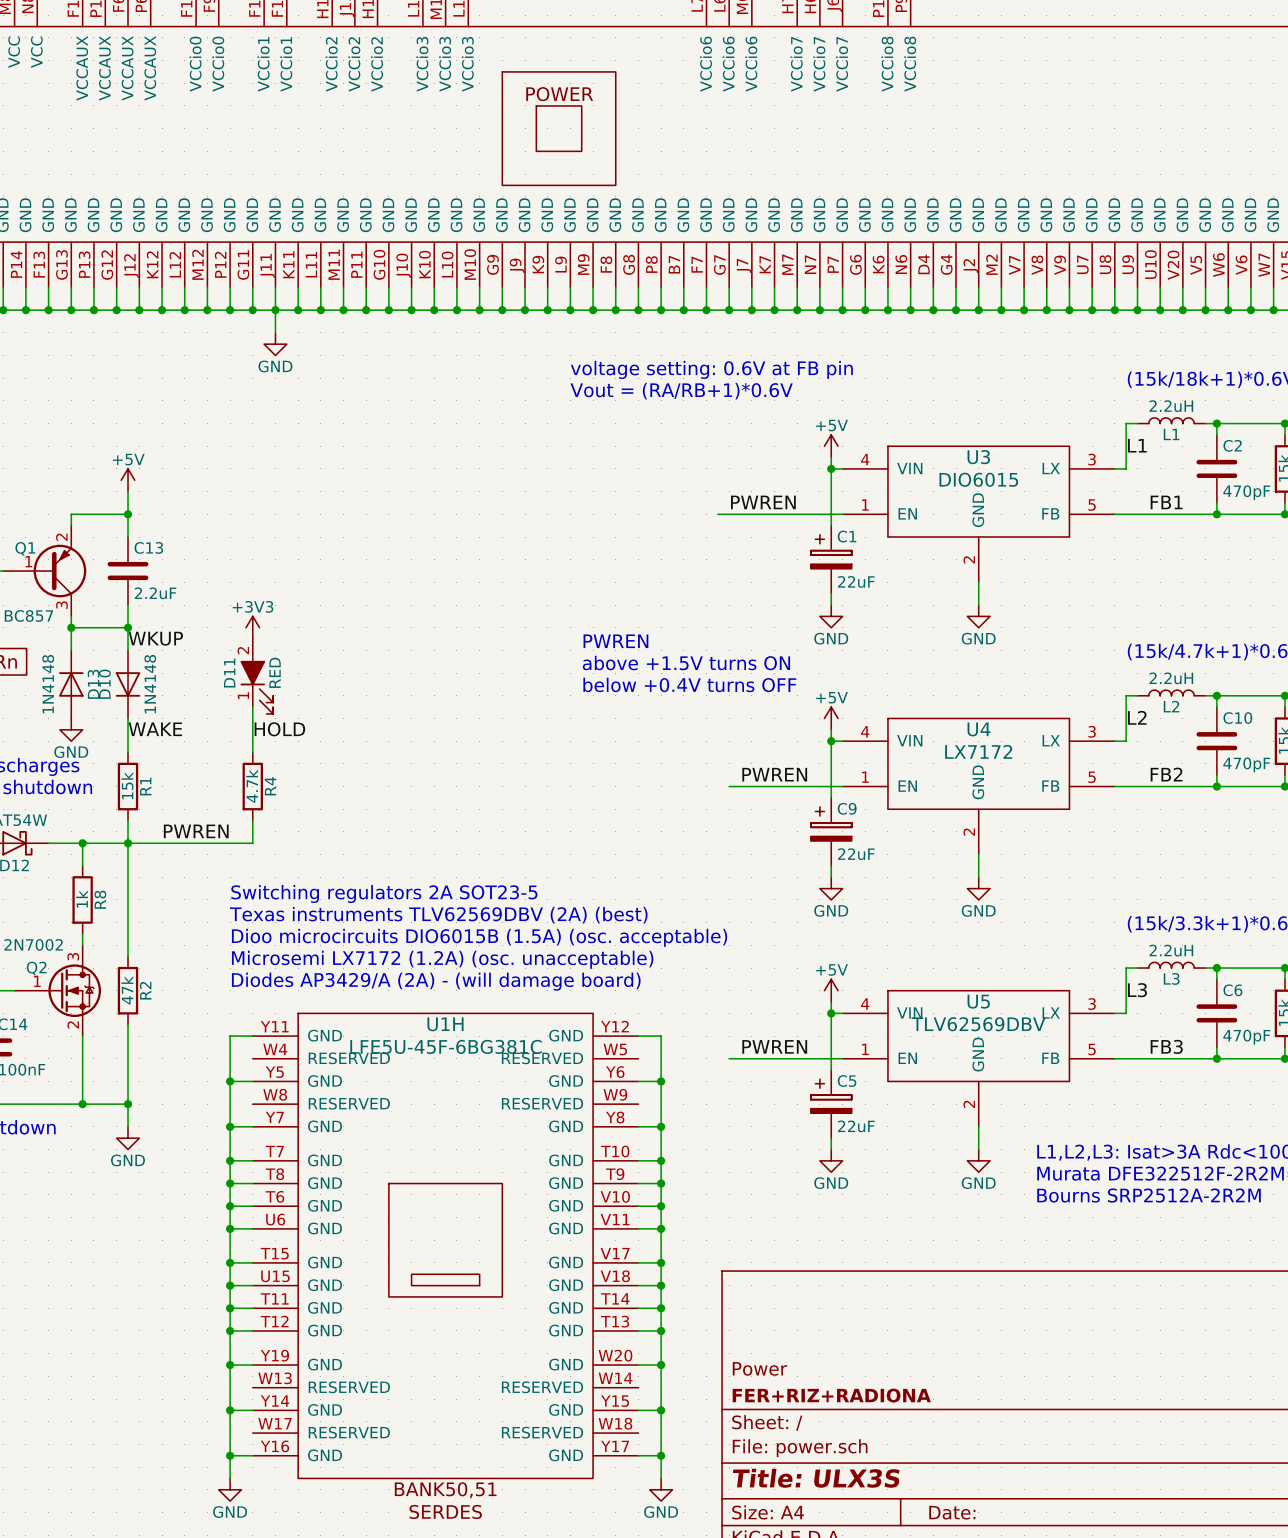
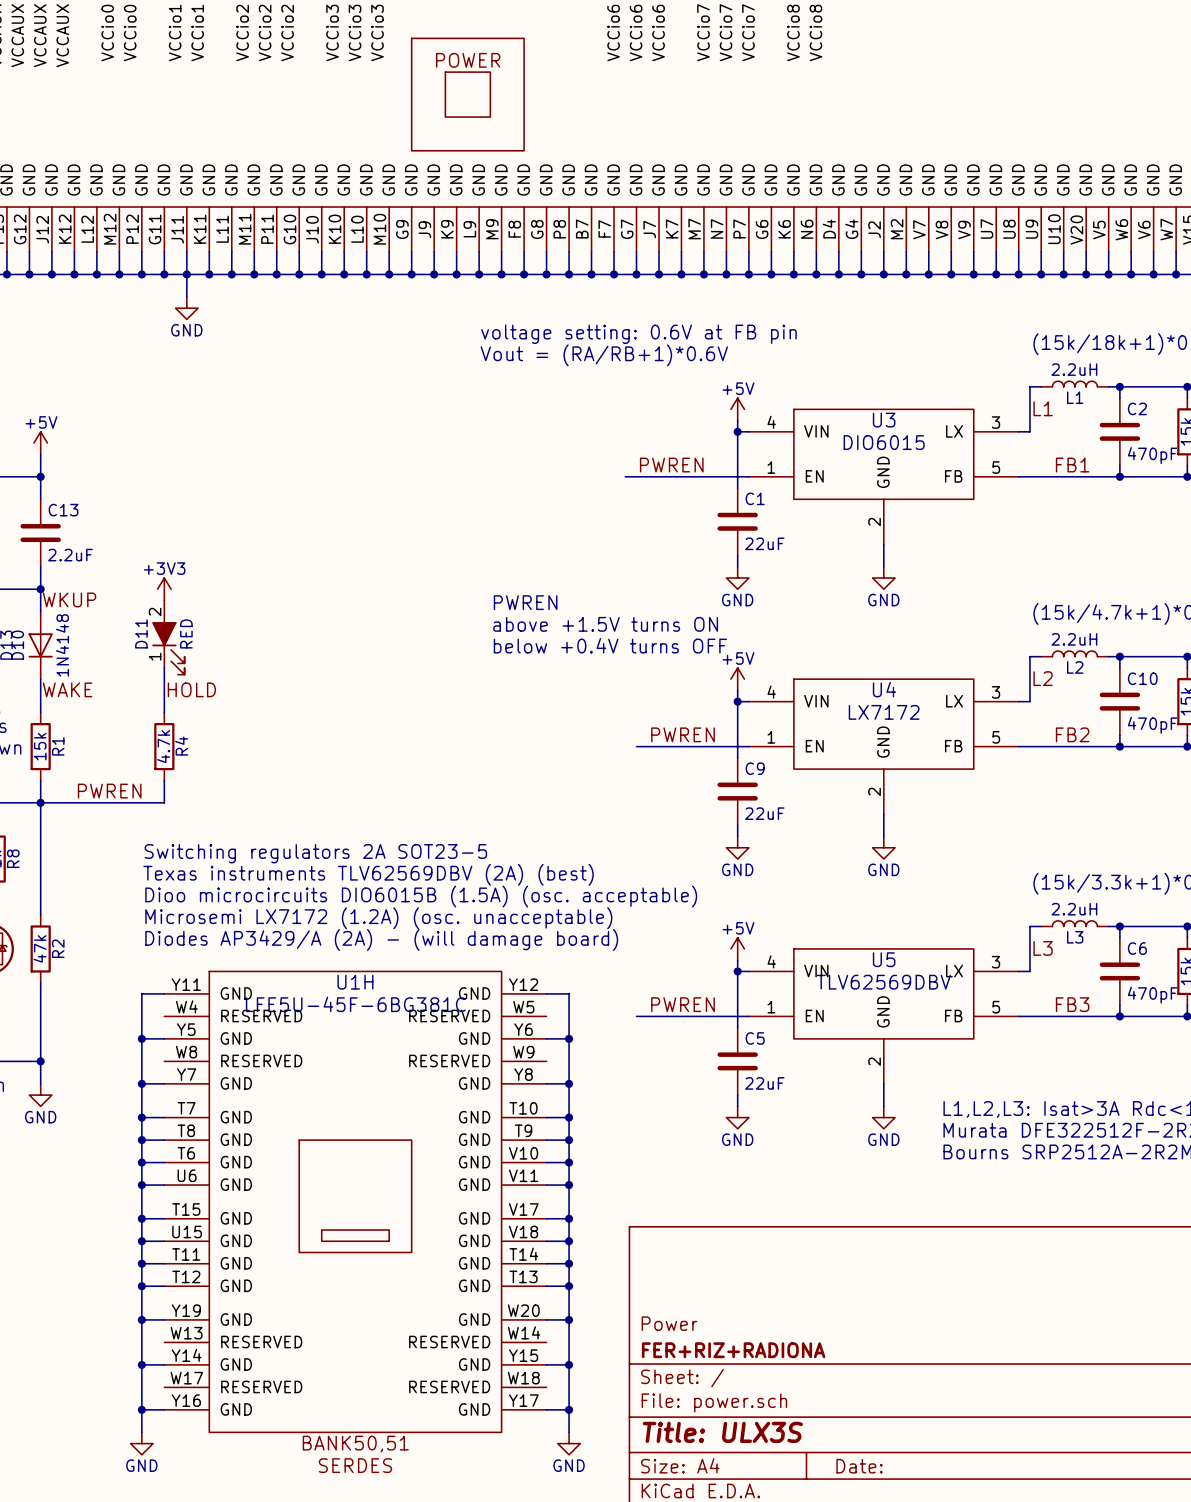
C1 symbol: [810, 525, 852, 594] -> [717, 488, 758, 556]
C9 symbol: [810, 797, 852, 866] -> [717, 757, 758, 826]
C5 symbol: [810, 1070, 852, 1139] -> [717, 1027, 758, 1096]

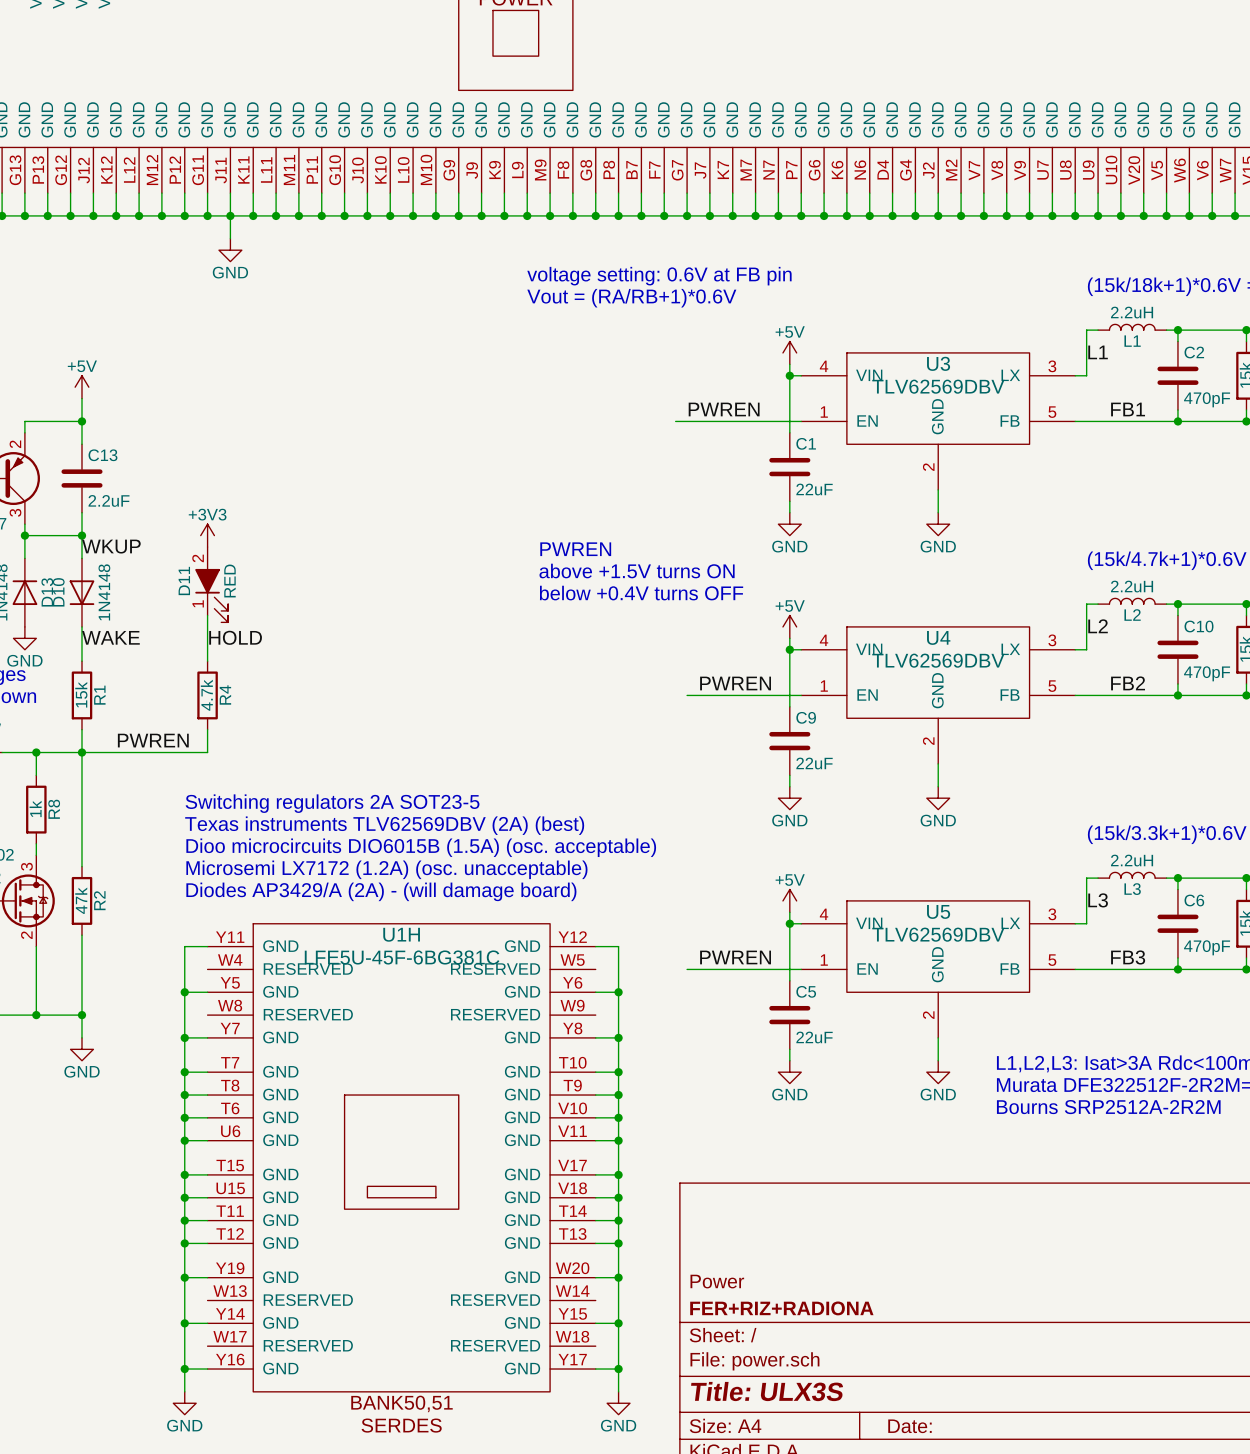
U3 value: DIO6015 (884, 442) -> TLV62569DBV (938, 386)
U4 value: LX7172 (884, 712) -> TLV62569DBV (938, 660)

